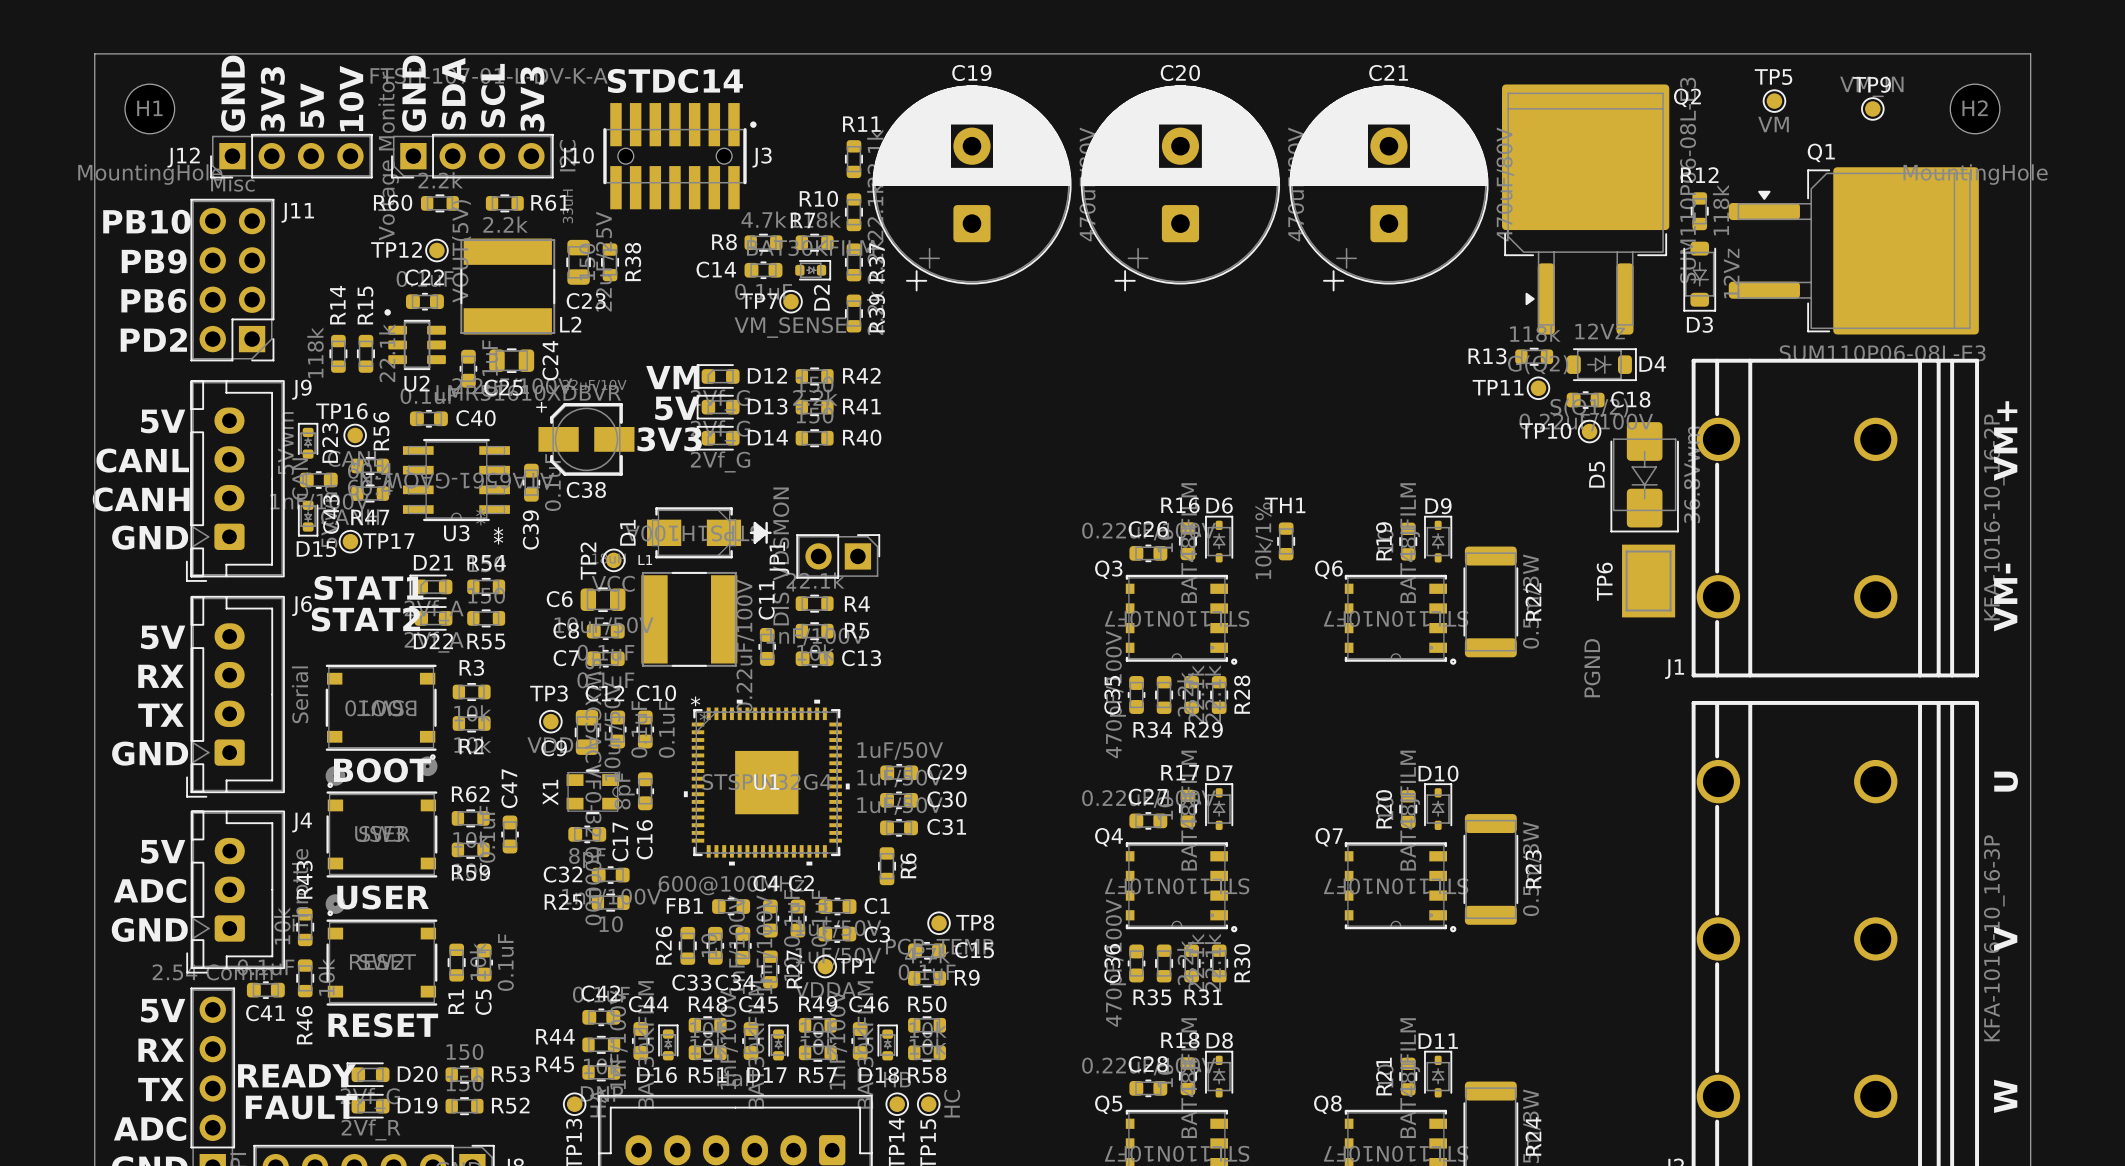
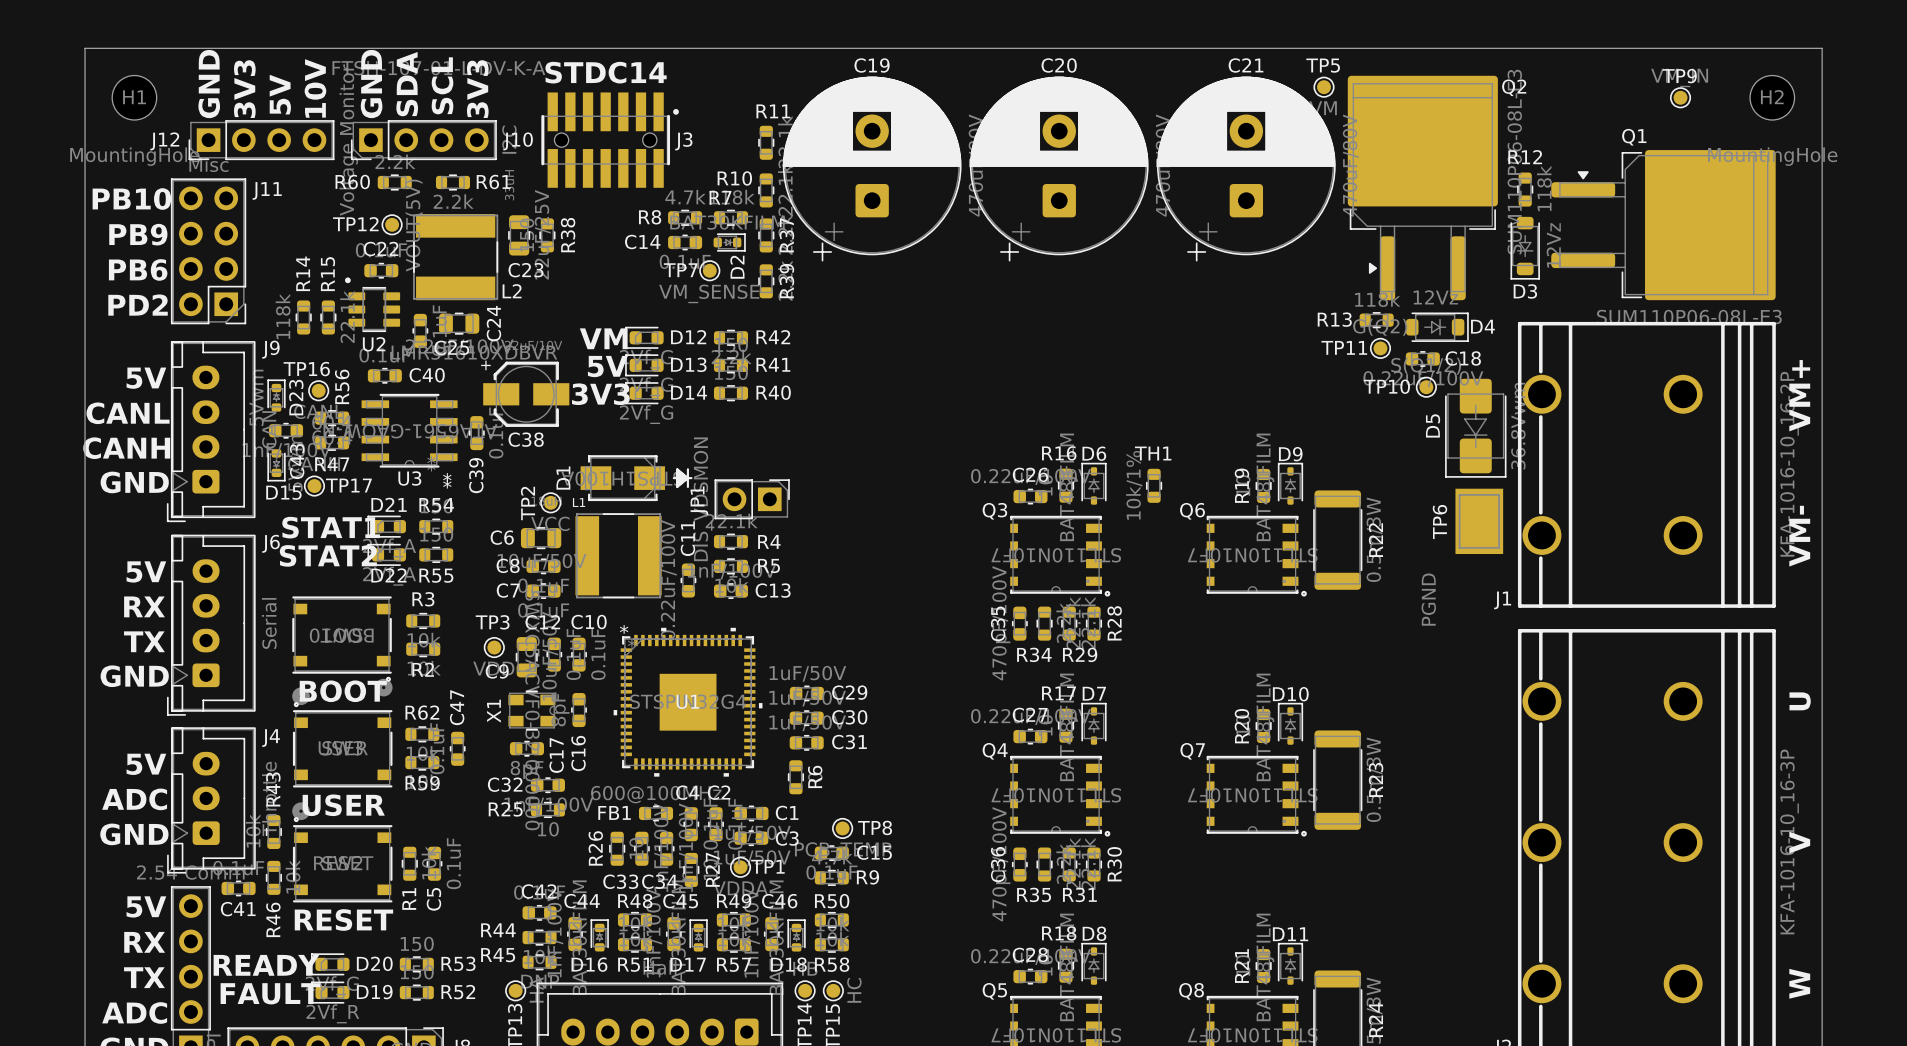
TP5 position: (1774, 101) -> (1324, 87)

